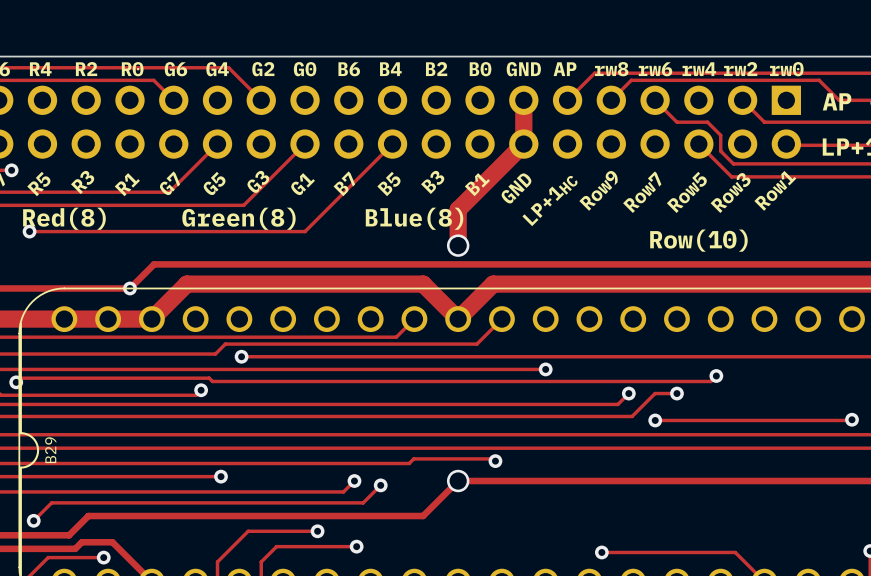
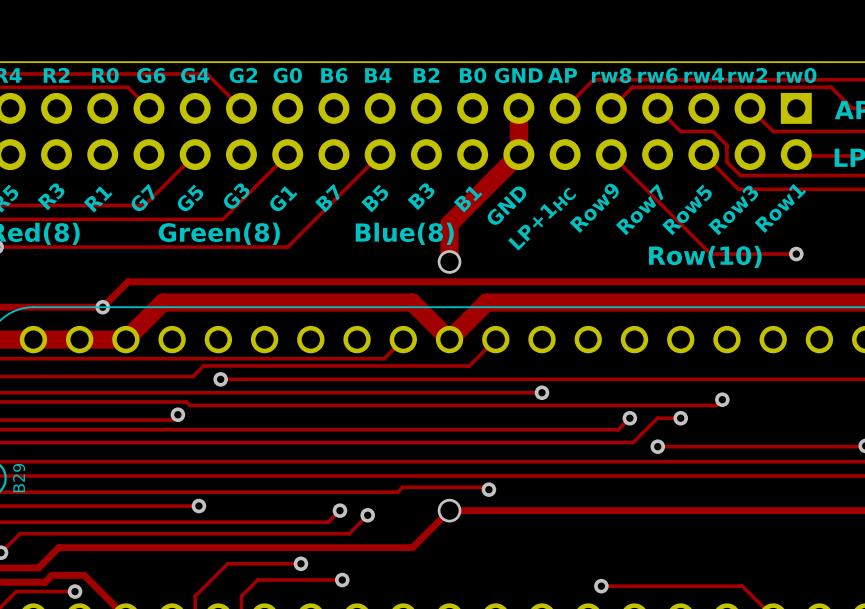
track: none -> (611, 154) (710, 254) (796, 254)
via: none -> (796, 254)

